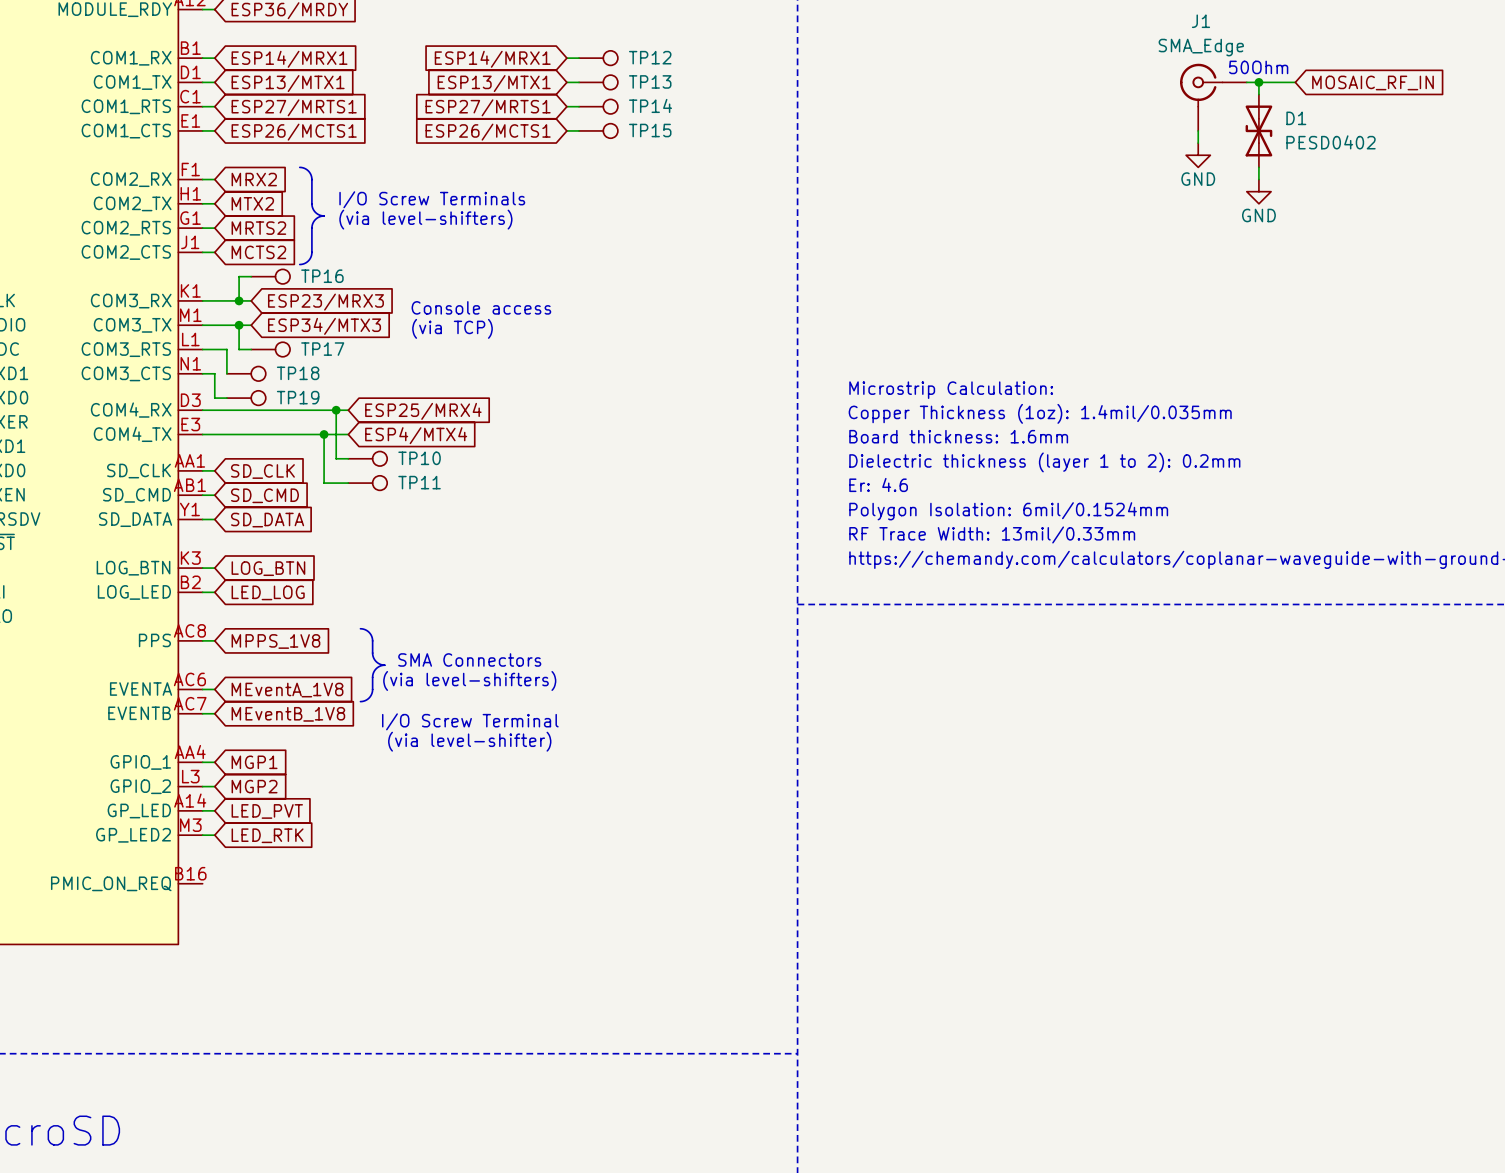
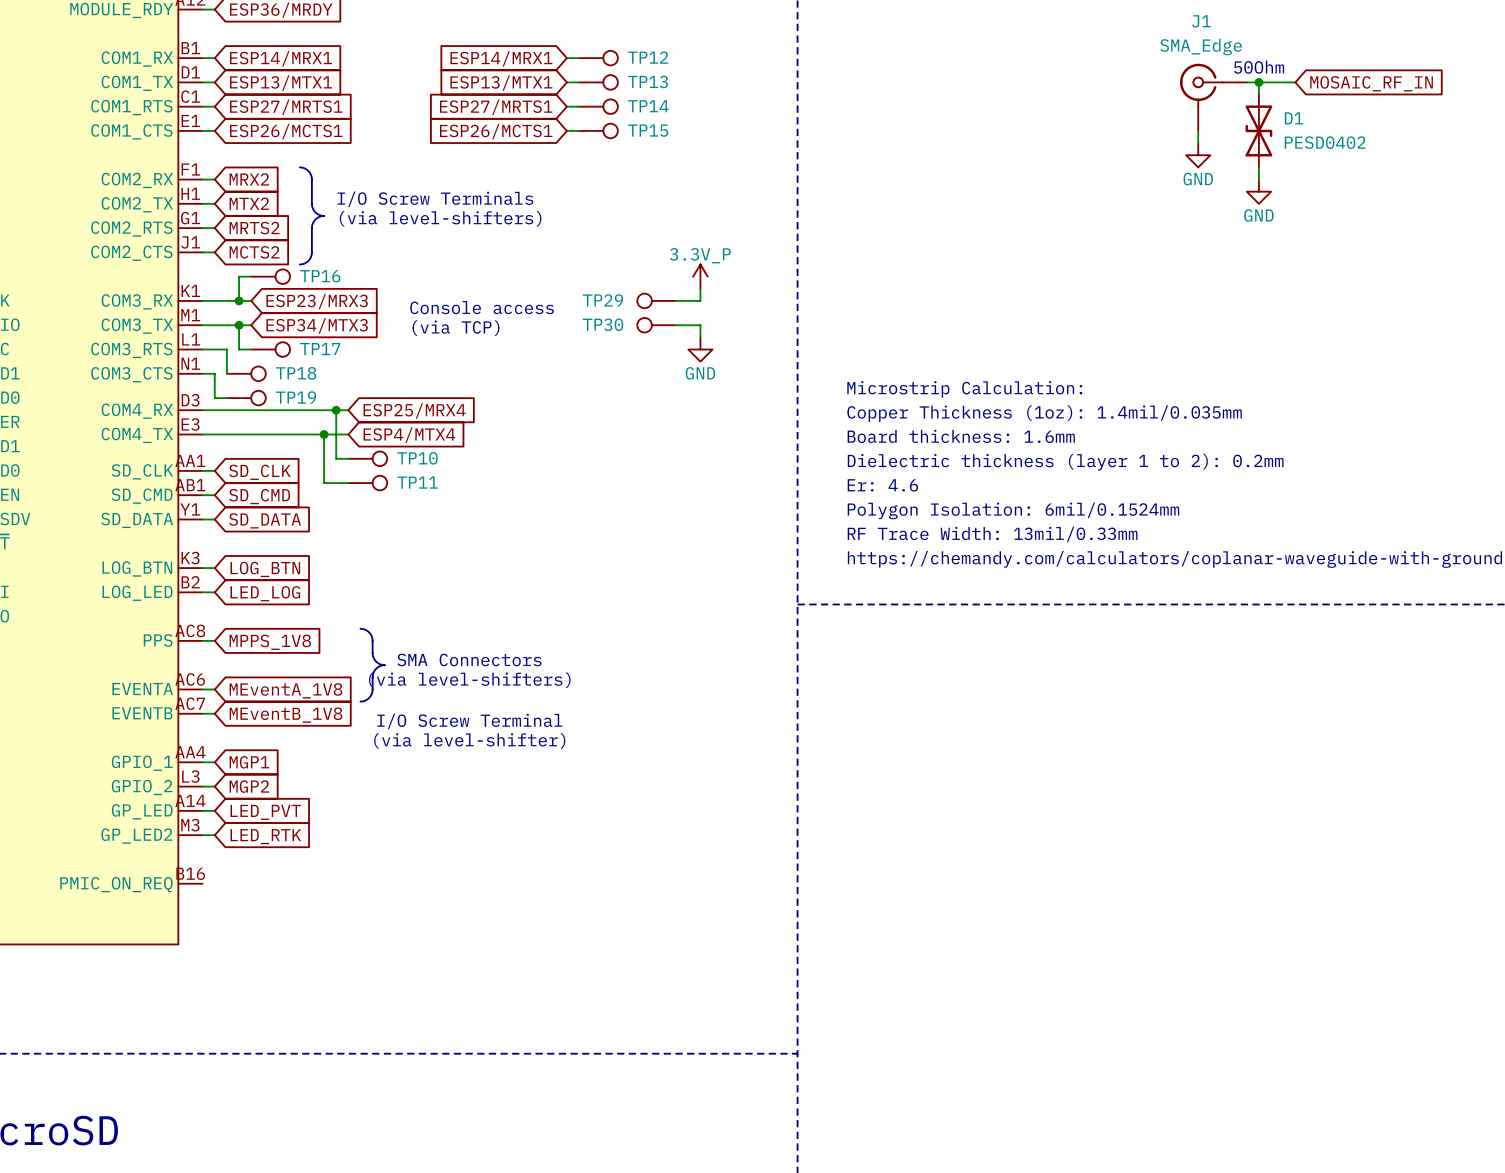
power symbol: none -> 3.3V_P (700, 276)
wire: none -> (700, 288) (700, 300) (676, 300)
TP29: none -> (656, 300)
TP30: none -> (656, 325)
wire: none -> (676, 325) (700, 325) (700, 337)
power symbol: none -> GND (700, 349)

